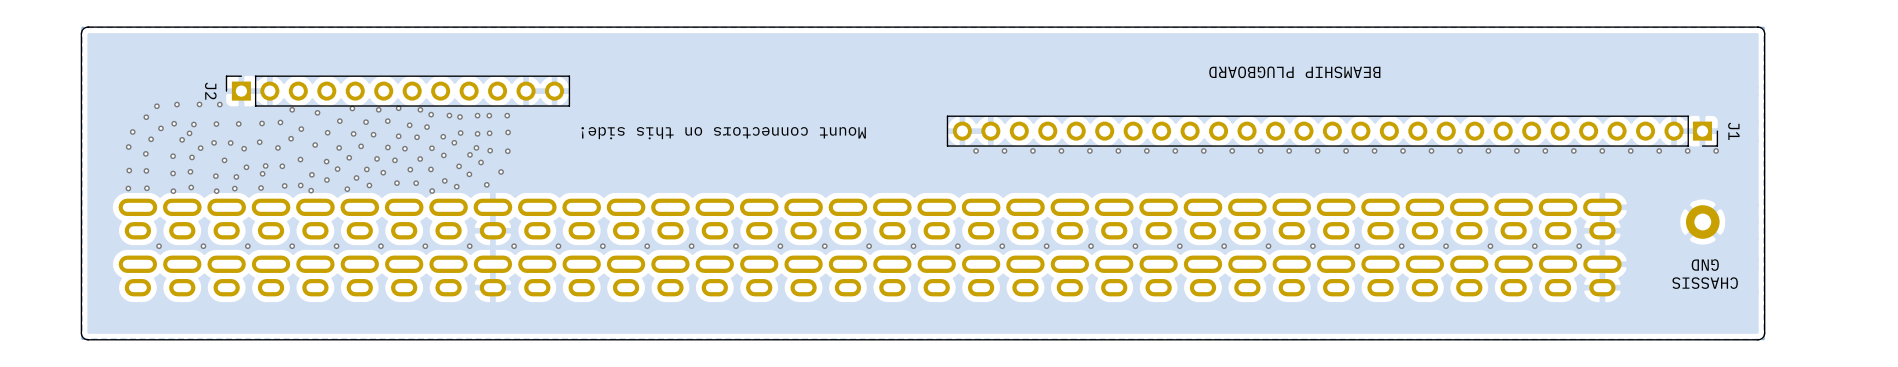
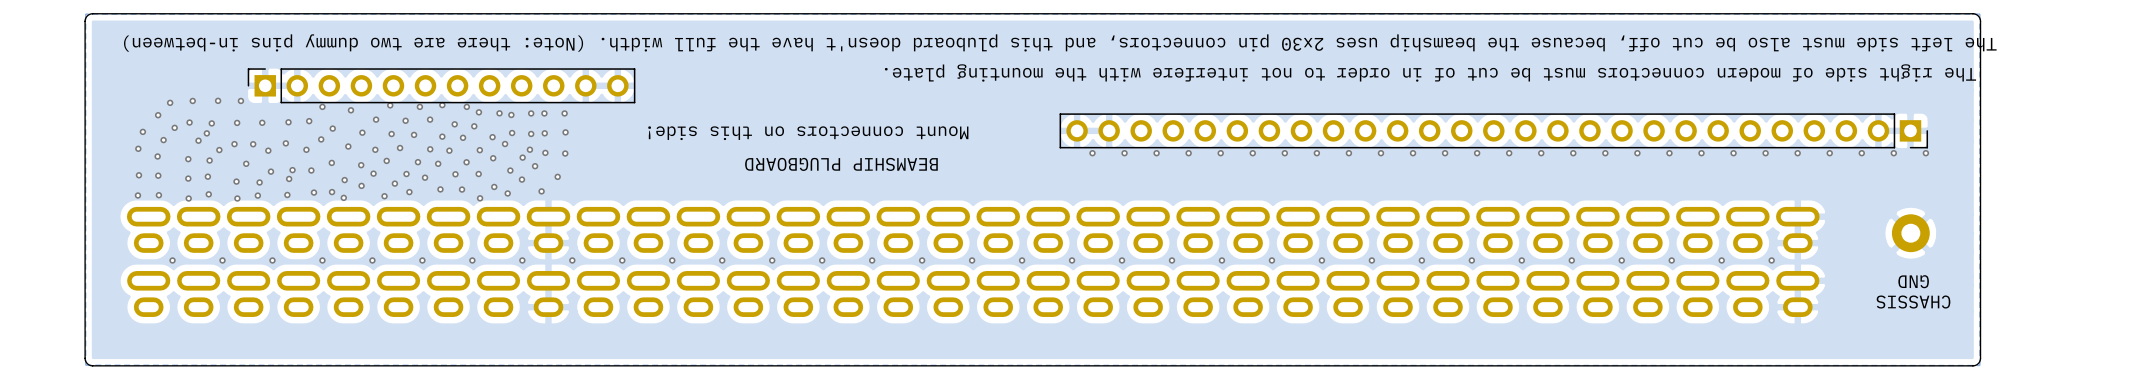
text: none -> The left side must also be cut off, because the beamship uses 2x30 pin connectors, and this pluboard doesn't have the full width. (Note: there are two dummy pins in-between) (1060, 43)
text: BEAMSHIP PLUGBOARD (1294, 72) -> none
text: none -> The right side of modern connectors must be cut of in order to not interfere with the mounting plate. (1430, 72)
J2 name: J2 (210, 91) -> none
J1 name: J1 (1733, 131) -> none
text: none -> BEAMSHIP PLUGBOARD (841, 164)

